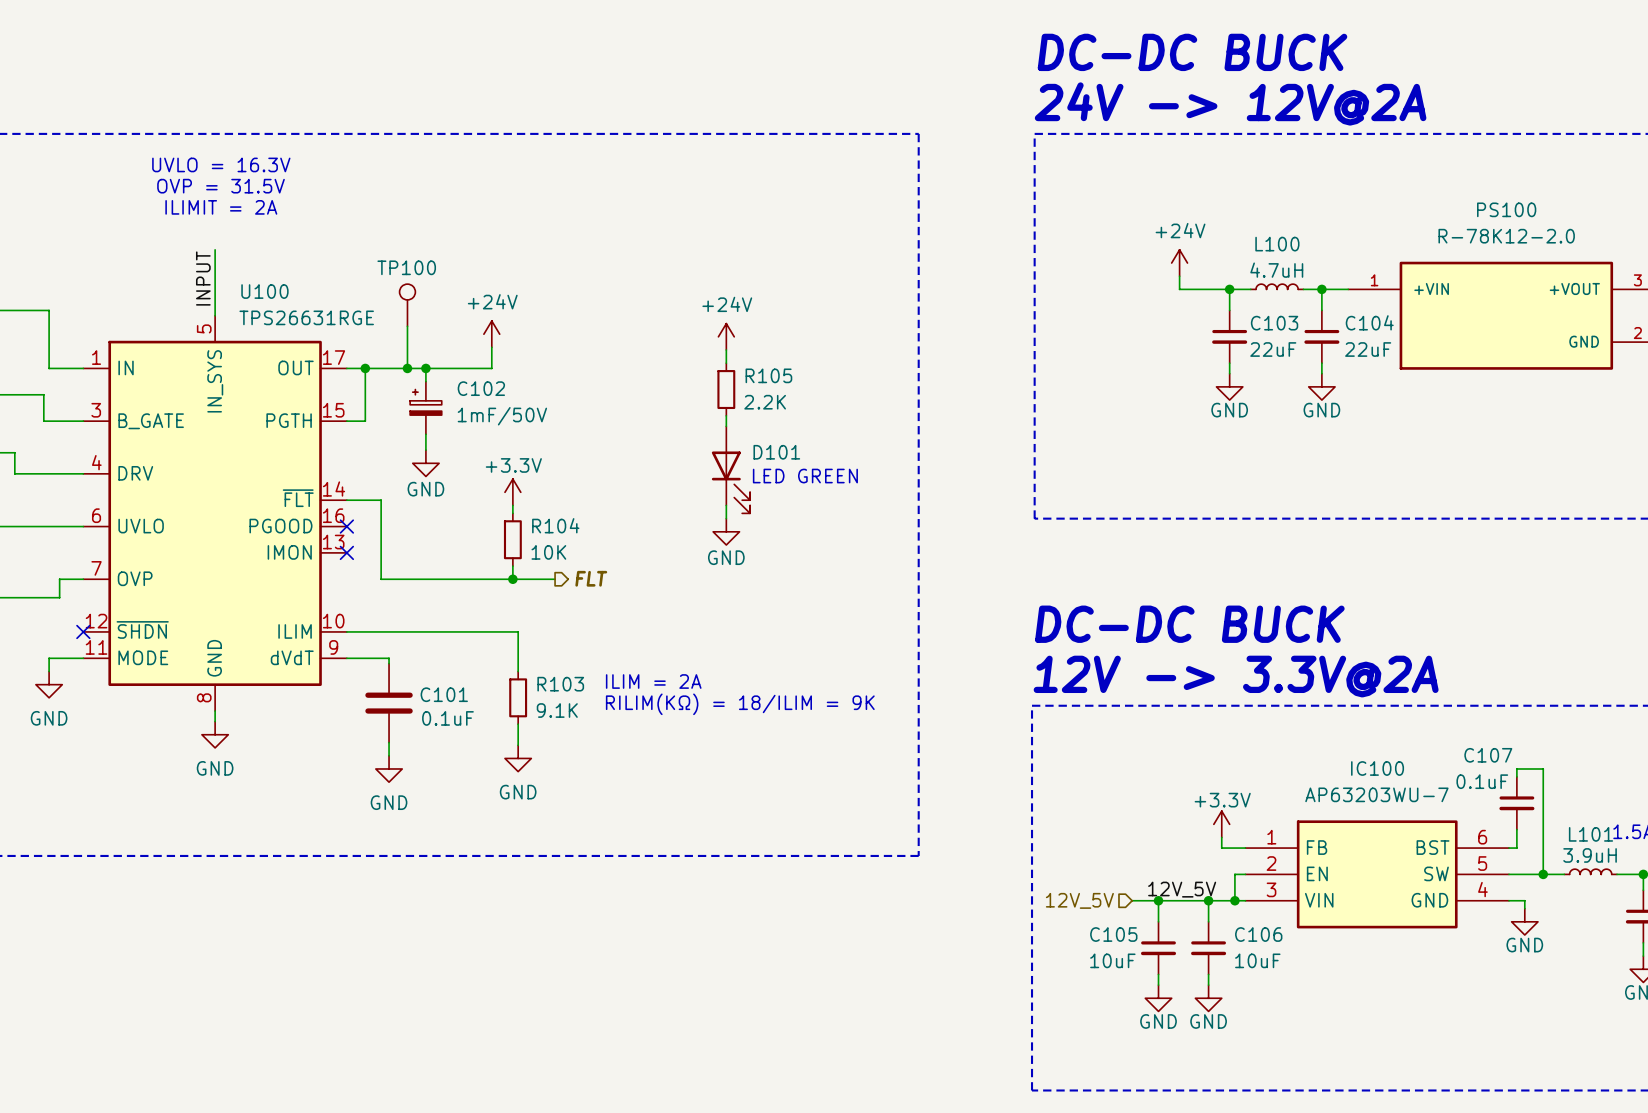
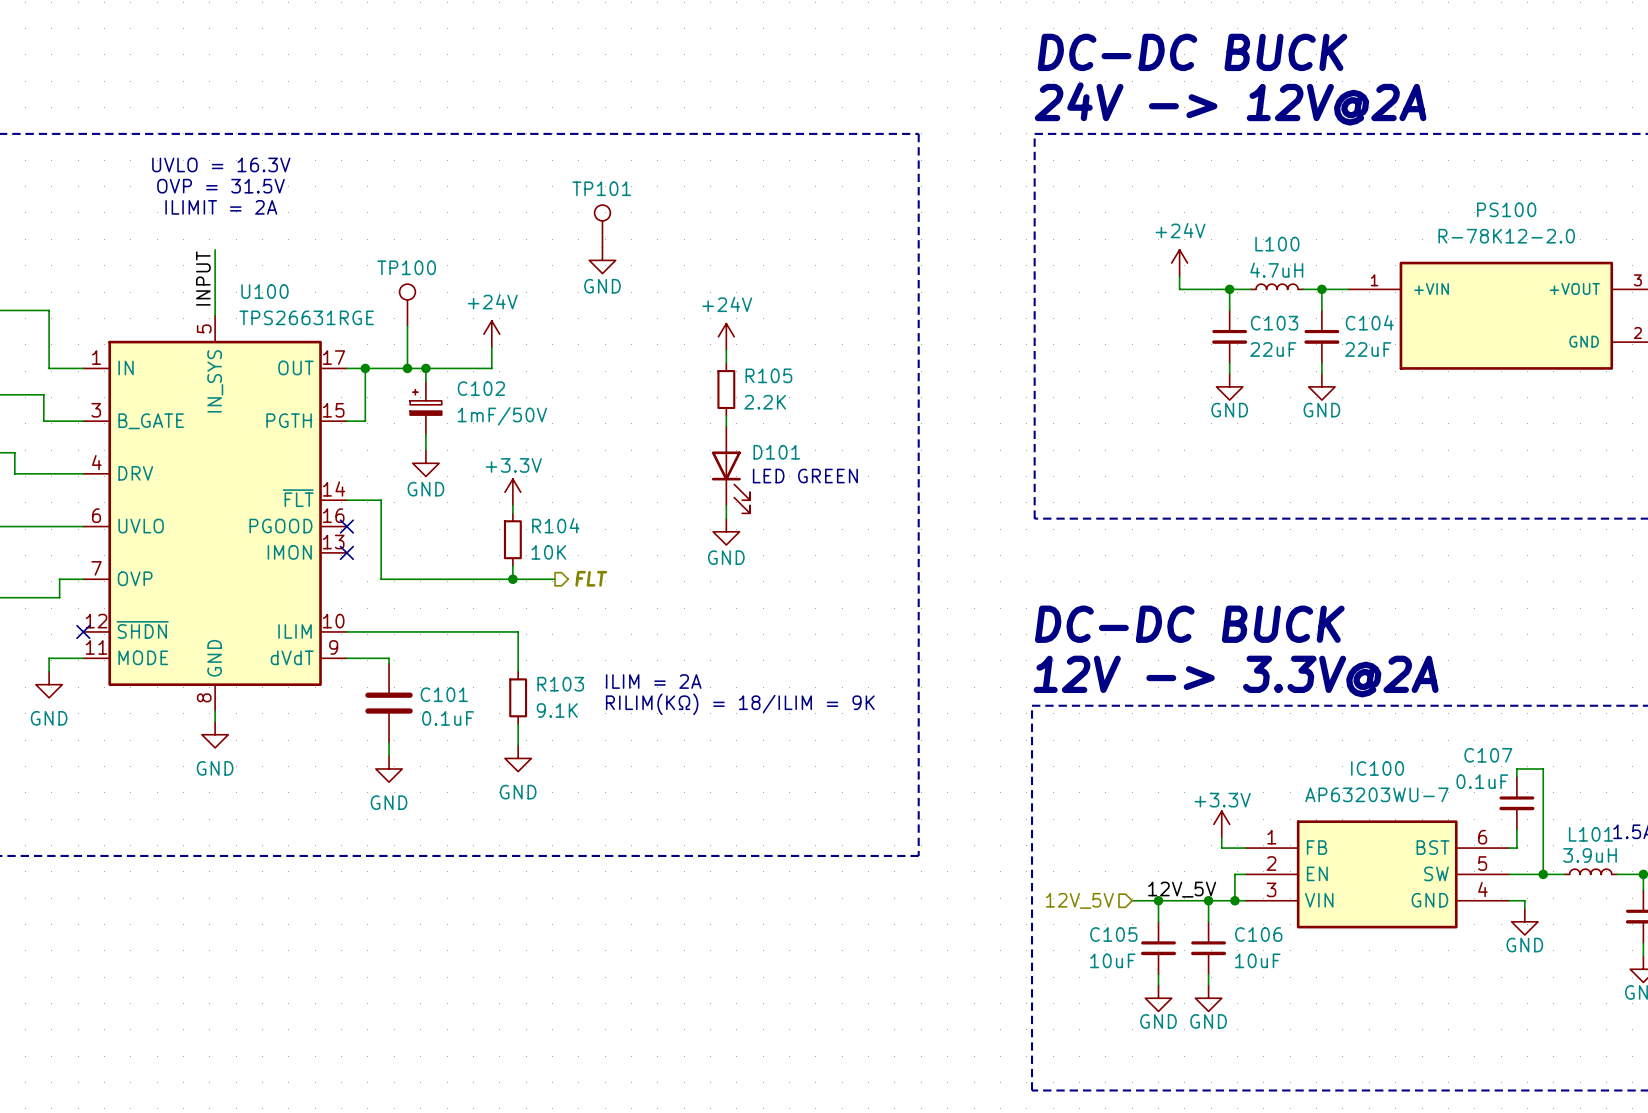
TP101: none -> (602, 226)
power symbol: none -> GND (602, 260)

